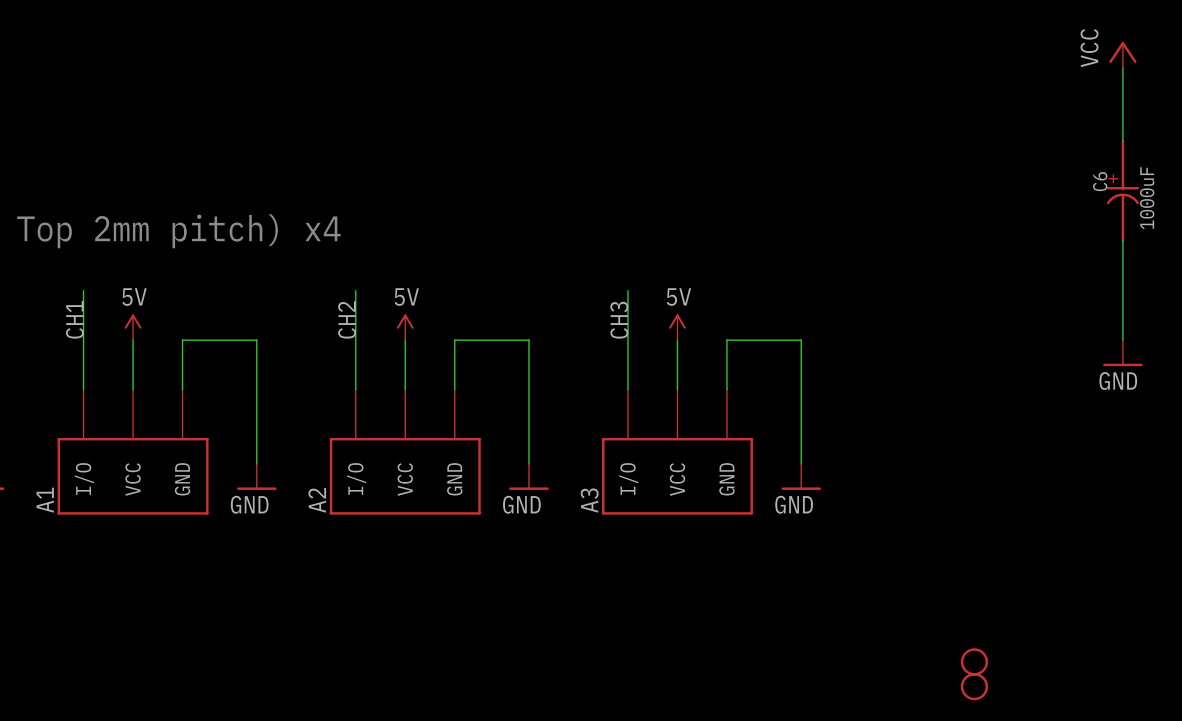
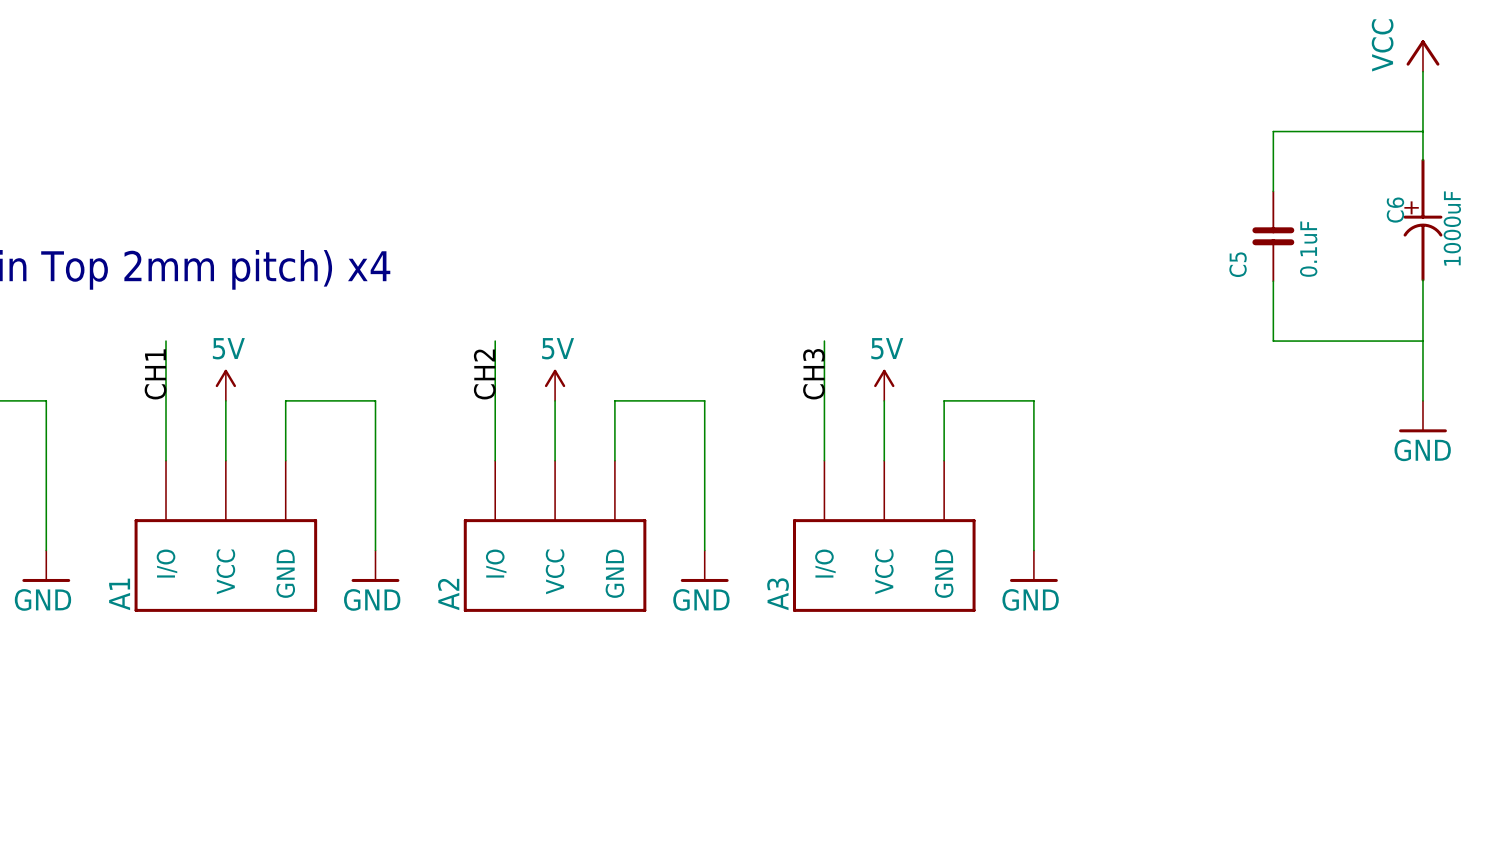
wire: none -> (1422, 131) (1273, 131) (1273, 191)
C5: none -> 0.1uF (1273, 236)
wire: none -> (1273, 281) (1273, 341) (1422, 341)
part: (974, 661) -> none
part: (974, 686) -> none

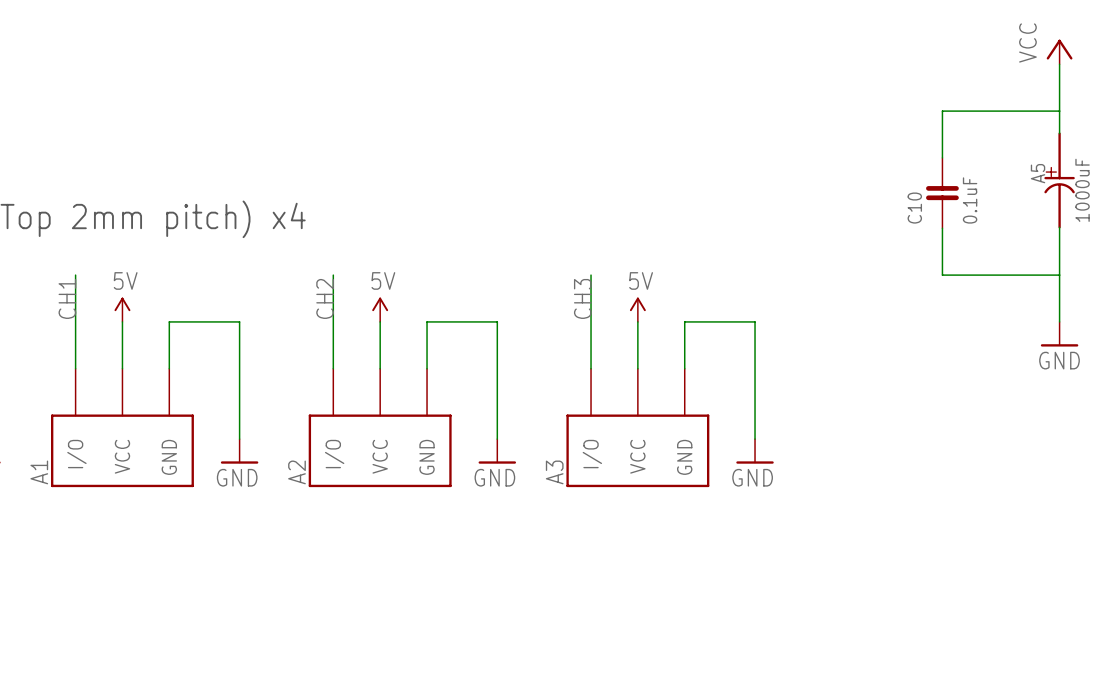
C6 name: C6 (1395, 210) -> A5 (1038, 173)
C5 name: C5 (1238, 264) -> C10 (914, 208)

